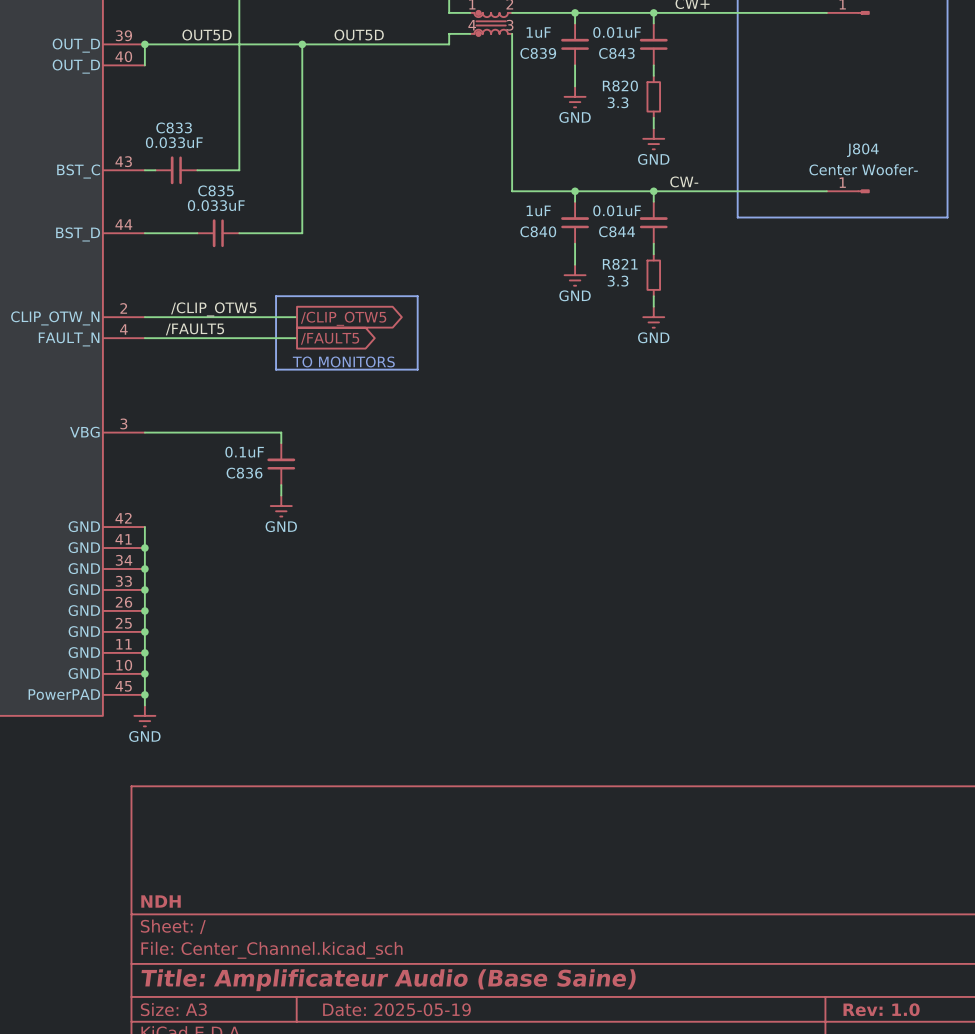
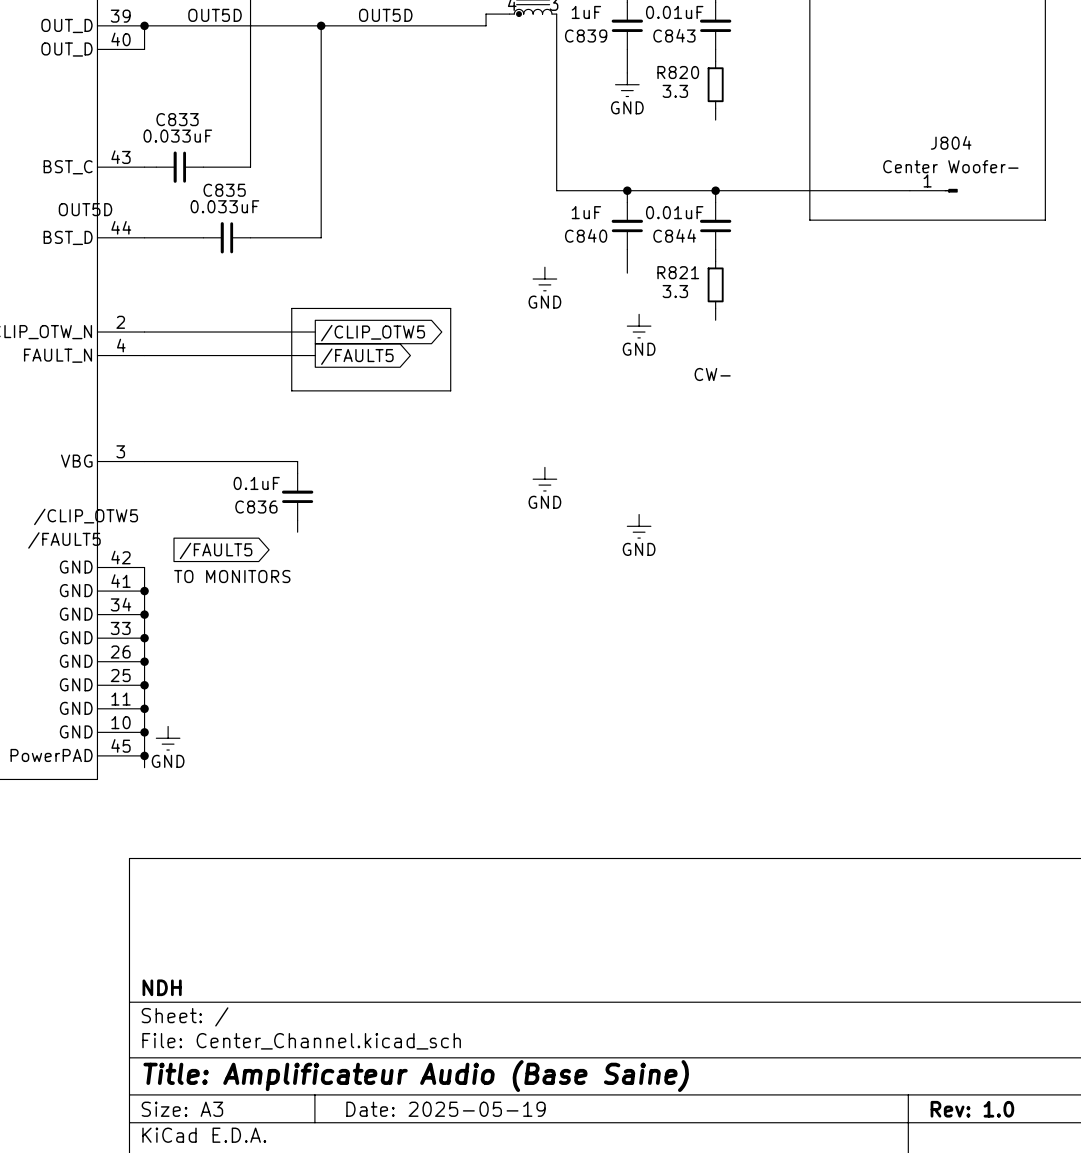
power symbol: GND (653, 138) -> none
label position: CW- (684, 181) -> CW- (712, 374)
label: none -> OUT5D (85, 209)
power symbol: none -> GND (544, 279)
power symbol: GND (575, 275) -> none
label: /CLIP_OTW5 (213, 309) -> none
power symbol: none -> GND (639, 326)
power symbol: GND (653, 317) -> none
label: /FAULT5 (194, 329) -> none
text: TO MONITORS (343, 361) -> none
power symbol: none -> GND (544, 479)
label: none -> /CLIP_OTW5 (86, 516)
power symbol: none -> GND (639, 526)
label: none -> /FAULT5 (64, 540)
power symbol: GND (281, 506) -> none
global label: none -> /FAULT5 (216, 550)
text: none -> TO MONITORS (232, 576)
power symbol position: GND (144, 715) -> GND (168, 738)

